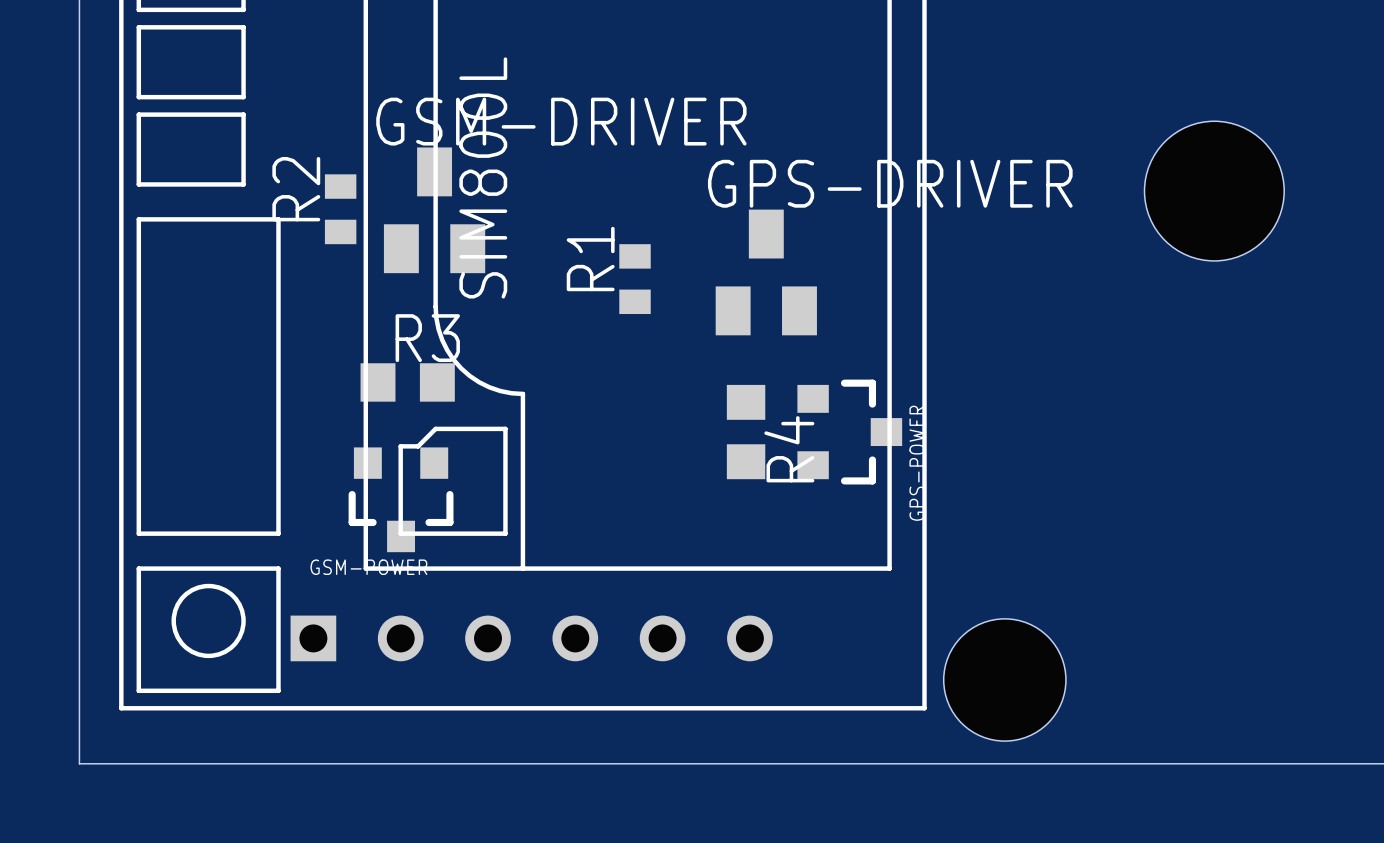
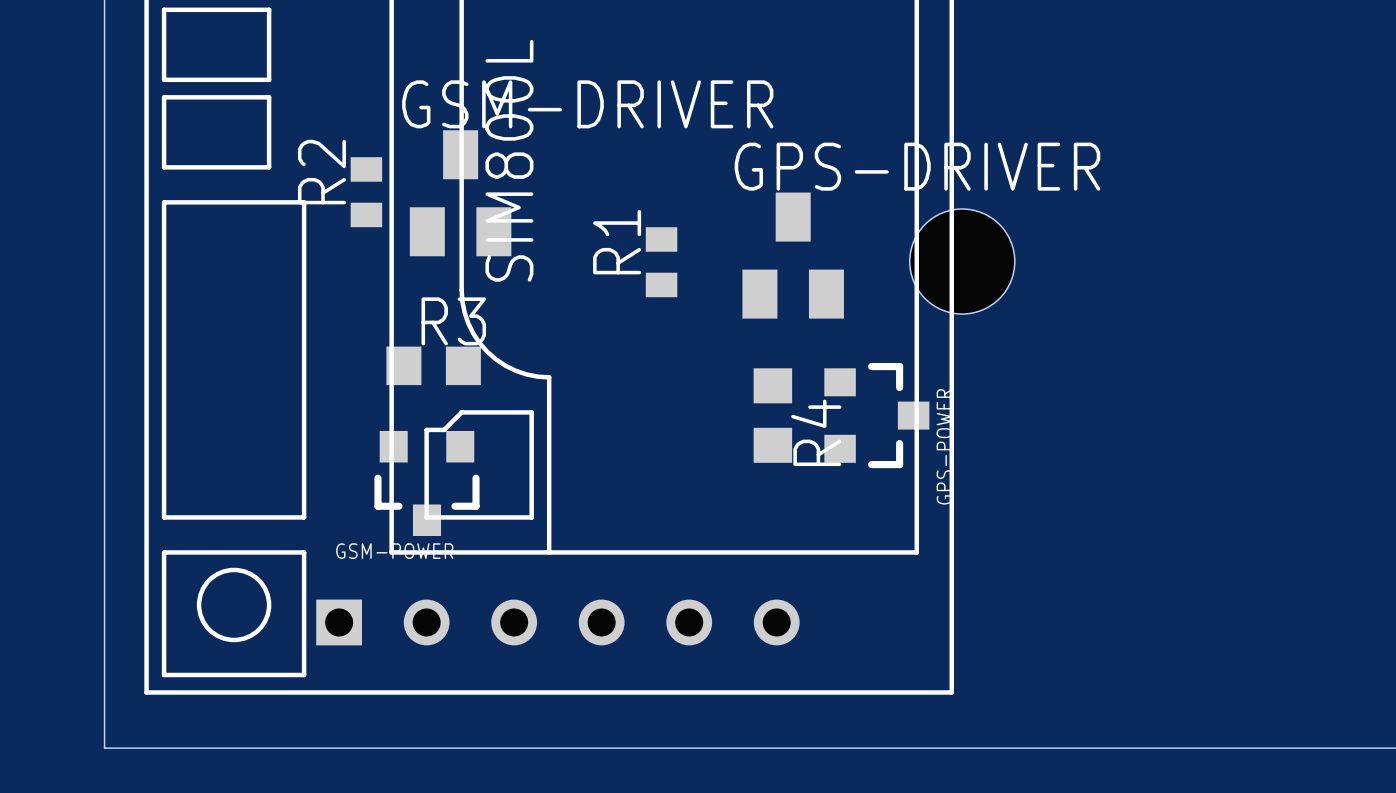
hole: (1214, 191) -> none
hole: none -> (962, 261)
hole: (1004, 679) -> none

